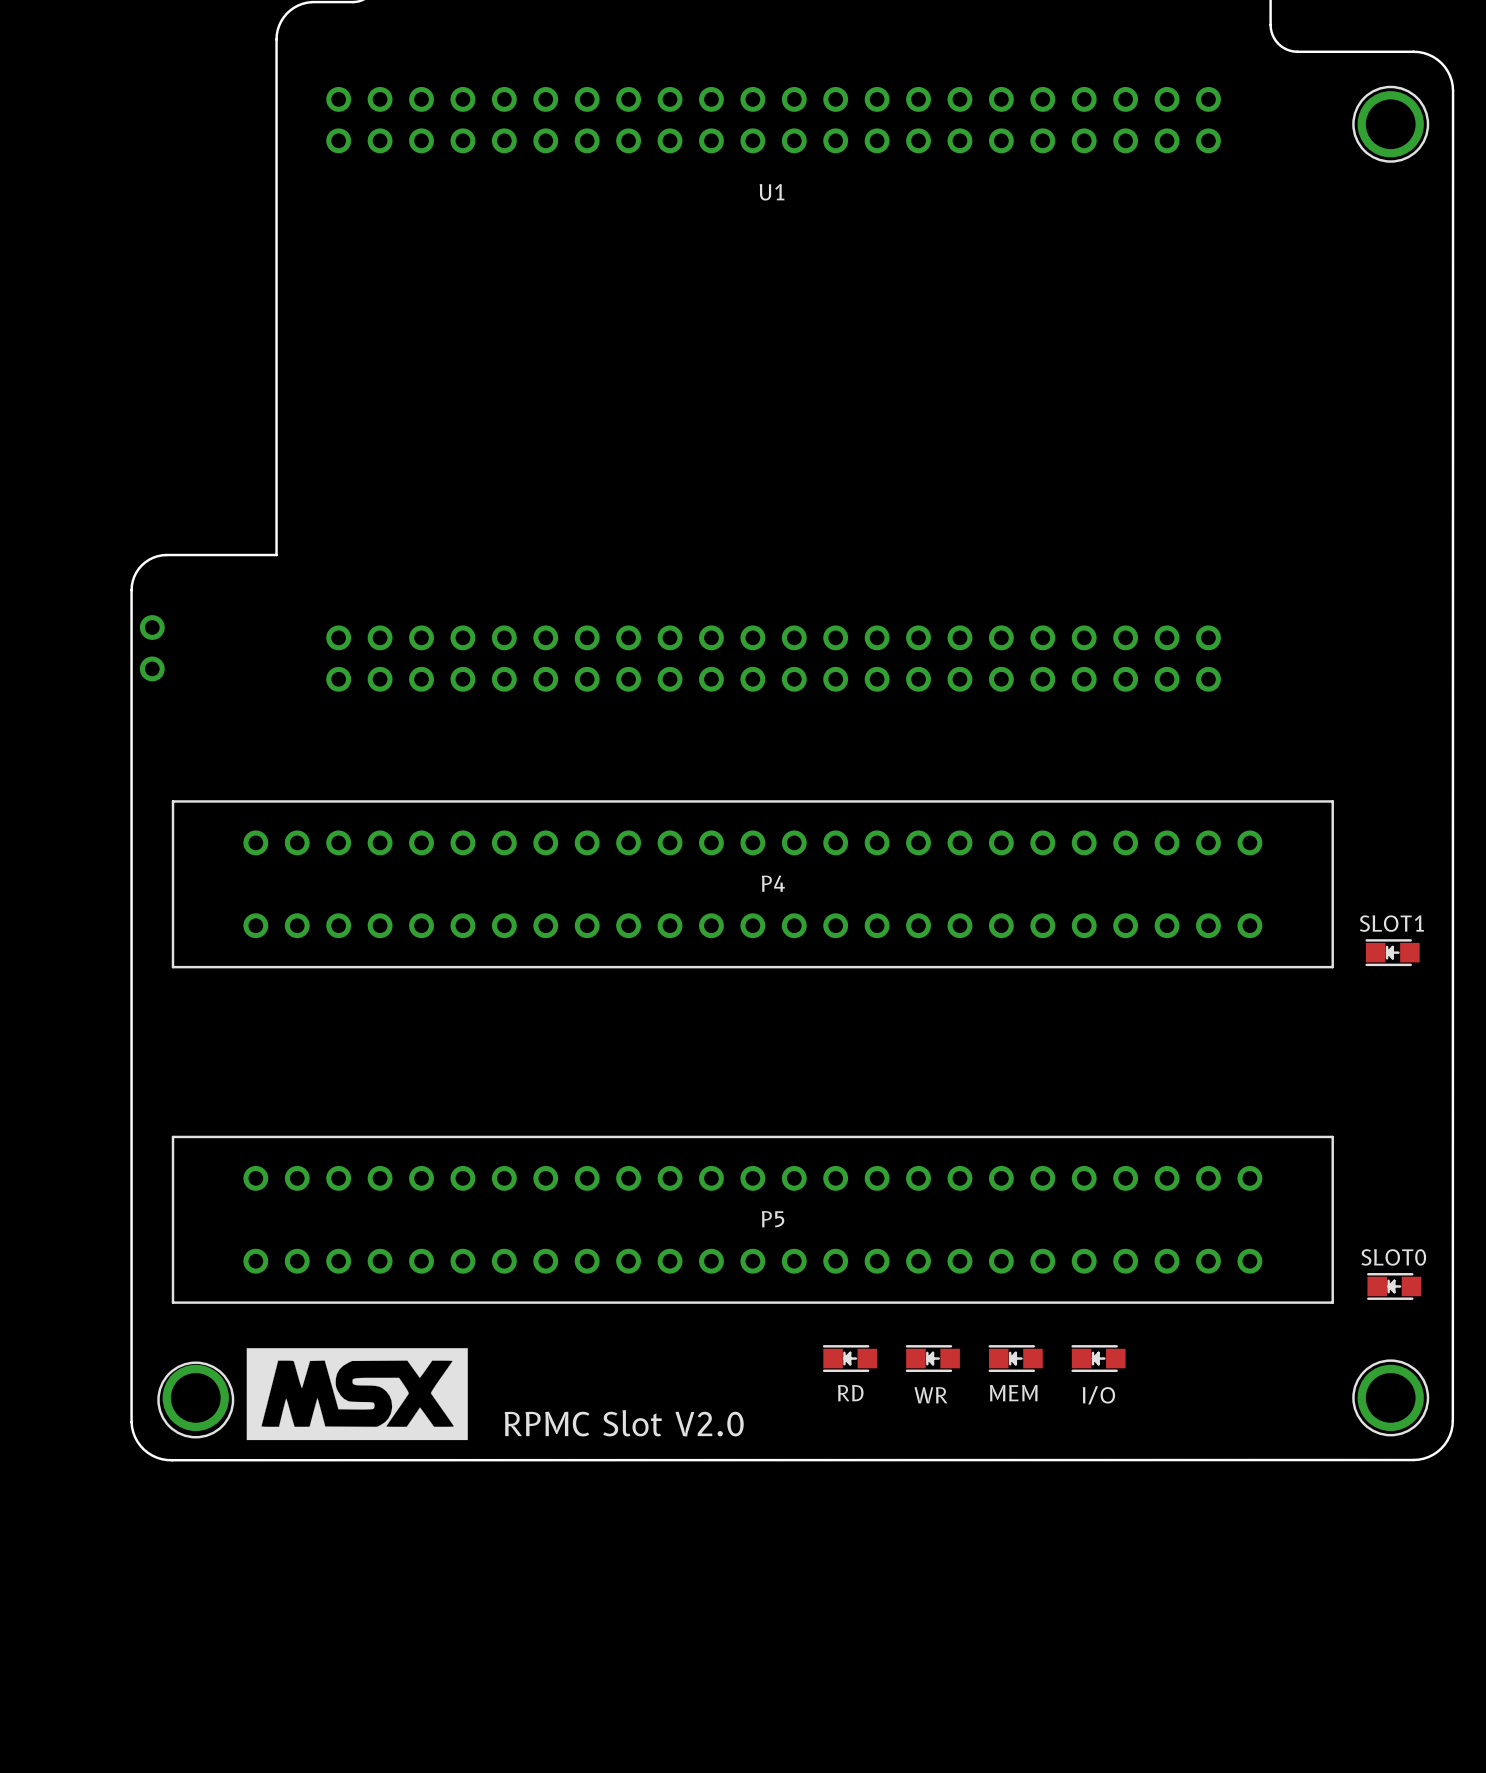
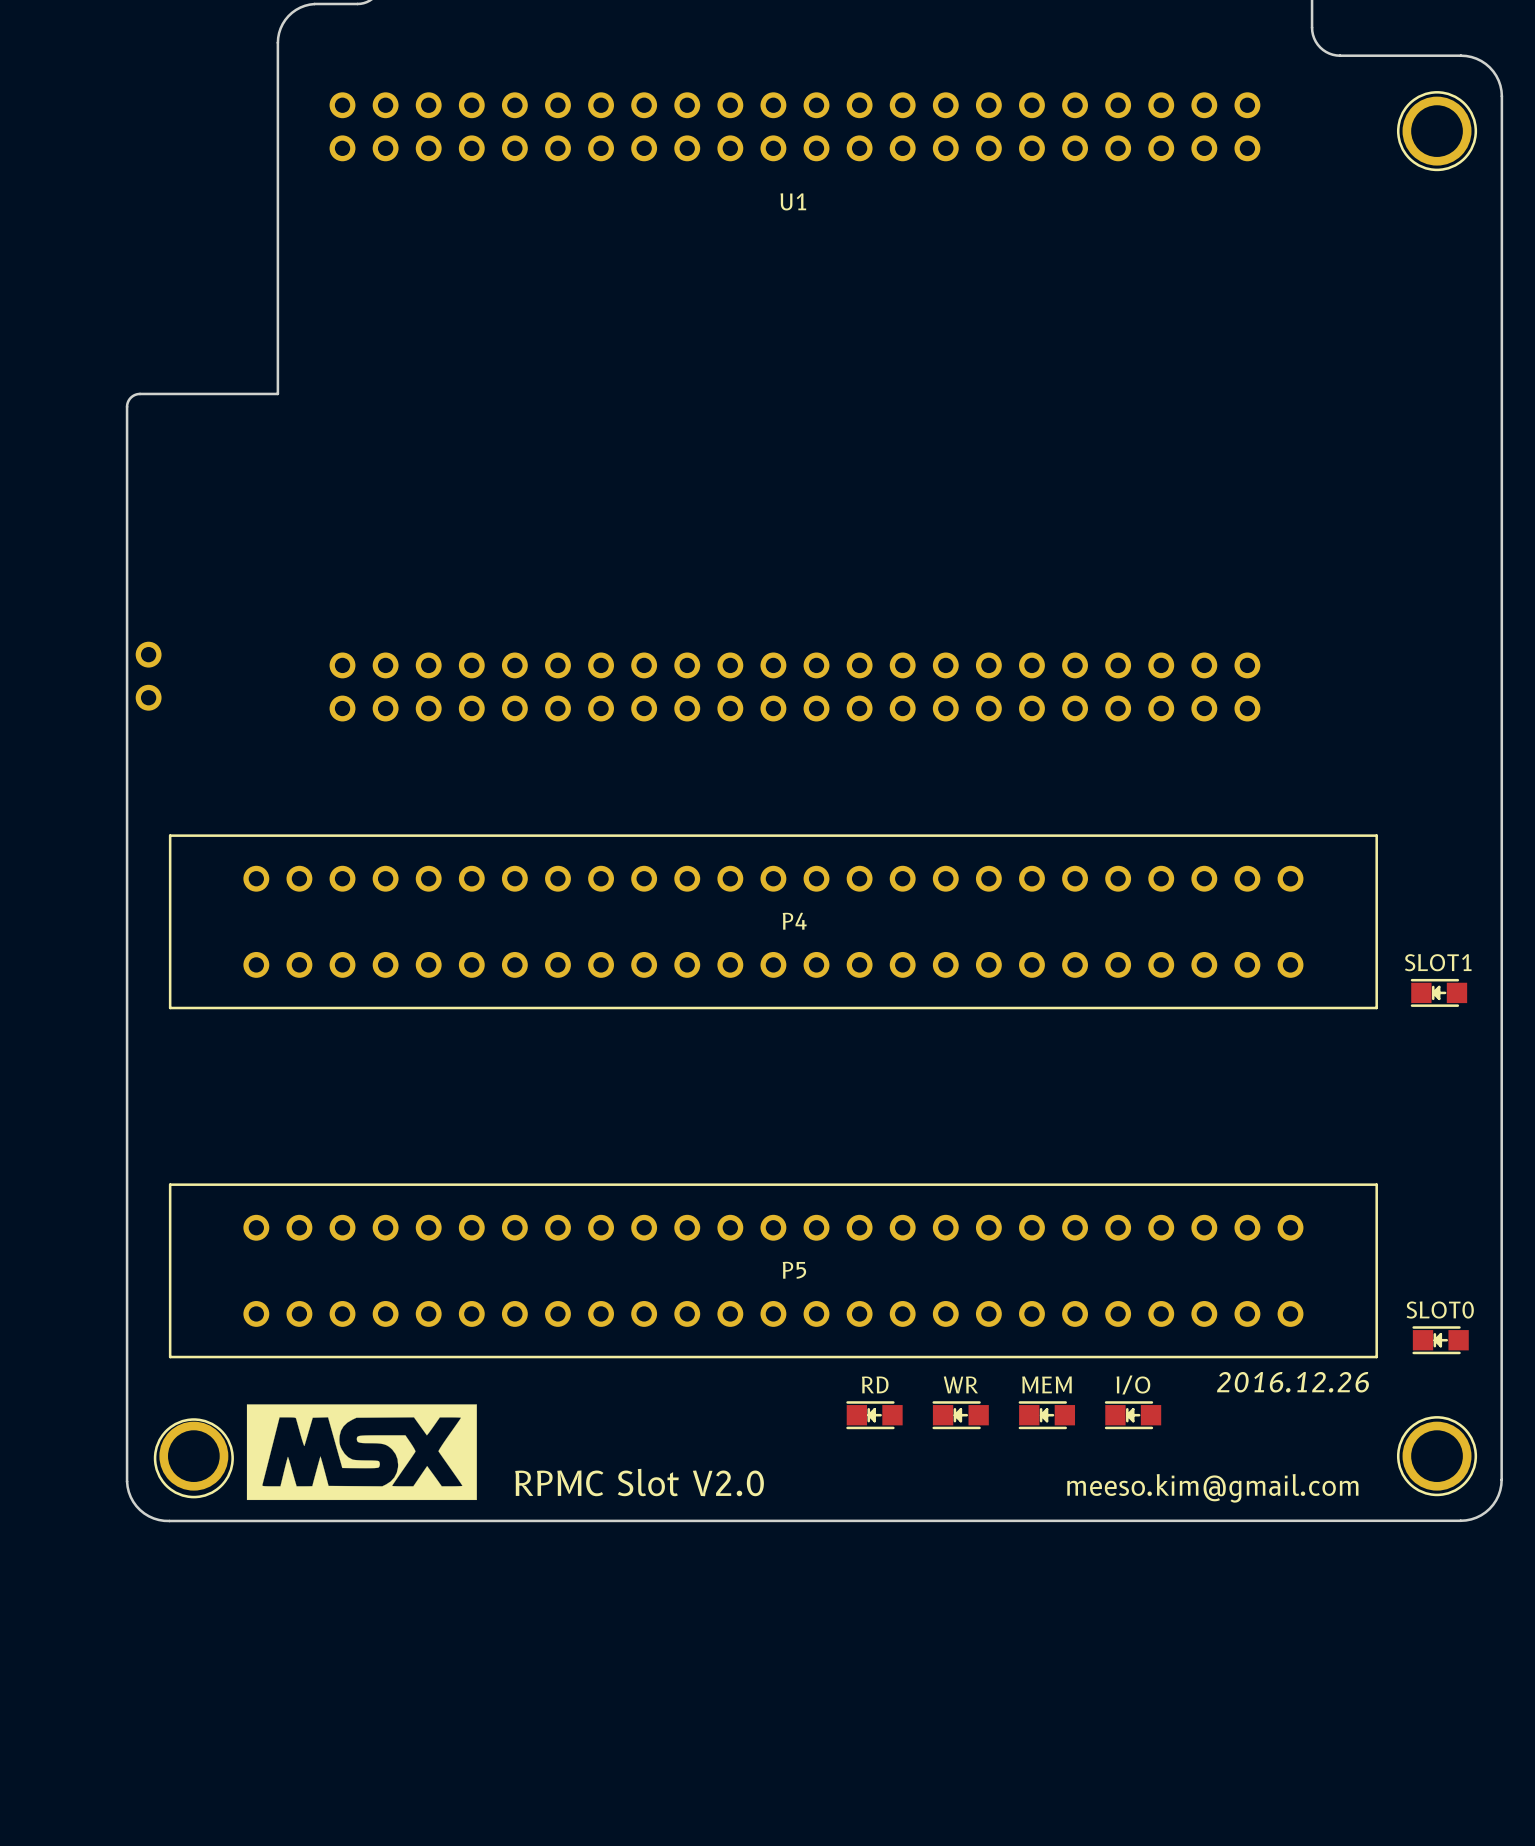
board edge: (276, 376) (276, 555) (157, 556) (149, 559) (138, 568) (134, 576) (131, 590) -> (277, 393) (139, 393) (129, 399) (127, 406) (127, 615)
text: none -> 2016.12.26 (1293, 1382)
RD name position: RD (850, 1393) -> RD (875, 1384)
MEM name position: MEM (1013, 1393) -> MEM (1046, 1384)
WR name position: WR (930, 1395) -> WR (960, 1384)
I/O name position: I/O (1098, 1395) -> I/O (1133, 1384)
text: none -> meeso.kim@gmail.com (1212, 1488)

